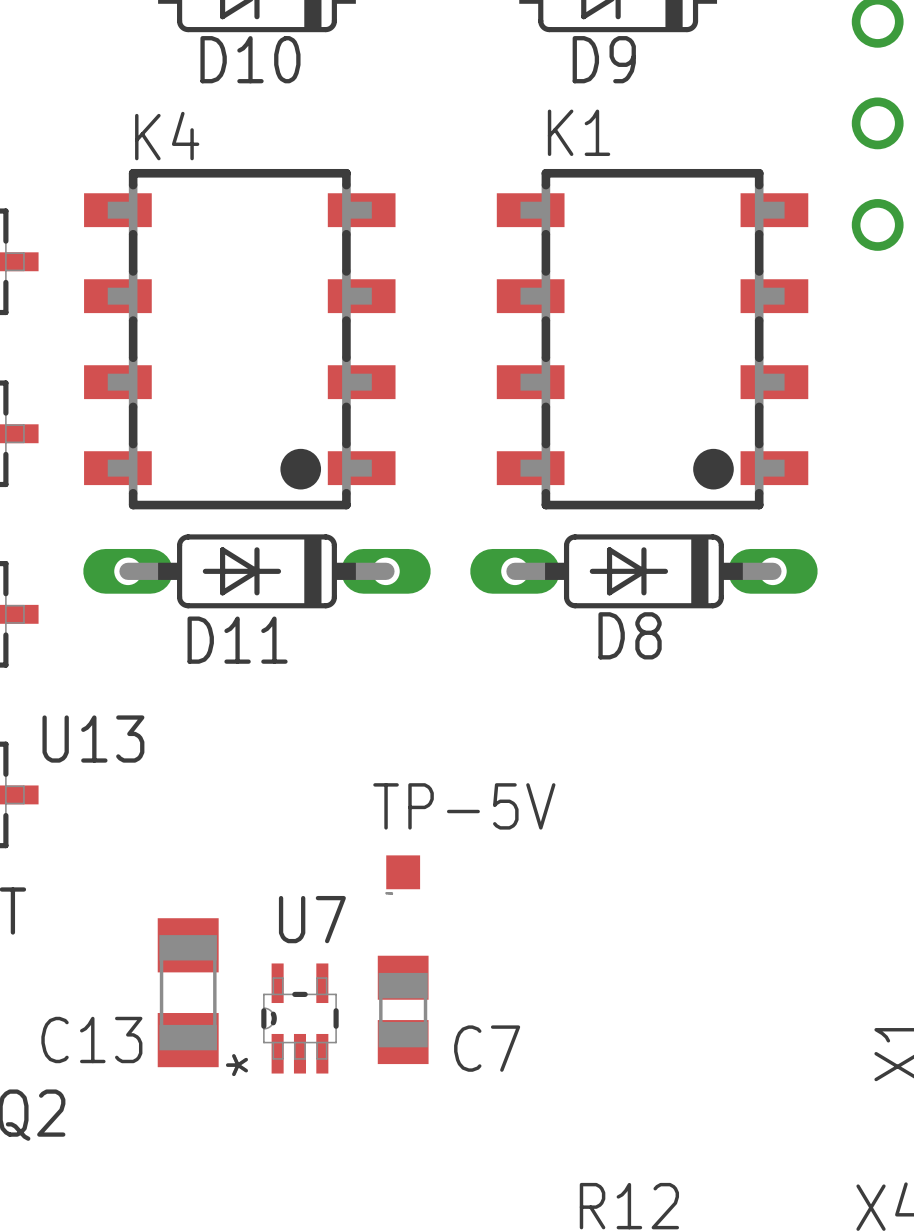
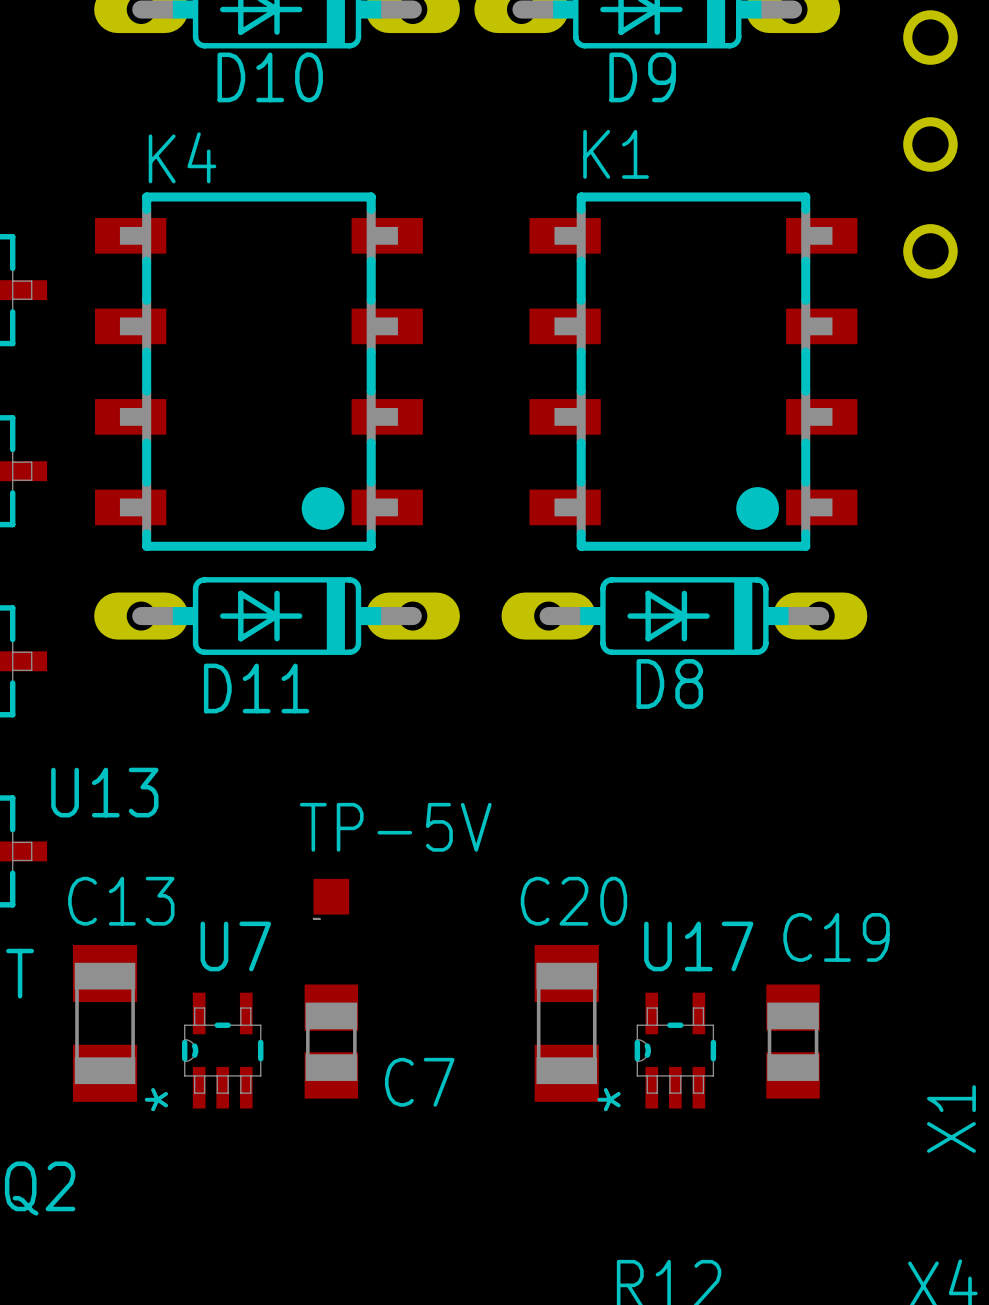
TP-5V position: (403, 872) -> (331, 896)
C20: none -> (566, 1023)
C19: none -> (793, 1041)
U17: none -> (675, 1050)
C13 position: (188, 992) -> (105, 1023)
C7 position: (403, 1009) -> (331, 1041)
U7 position: (299, 1018) -> (222, 1050)
C13 name position: C13 (91, 1039) -> C13 (121, 901)

